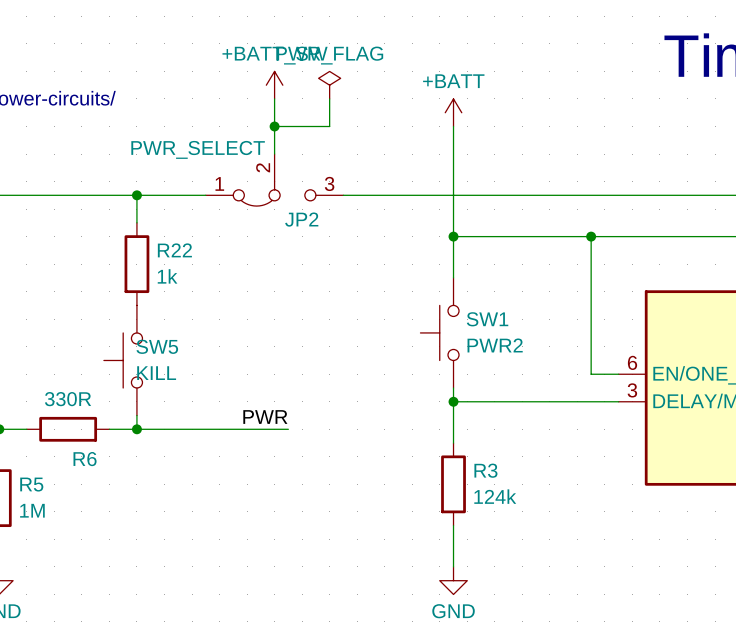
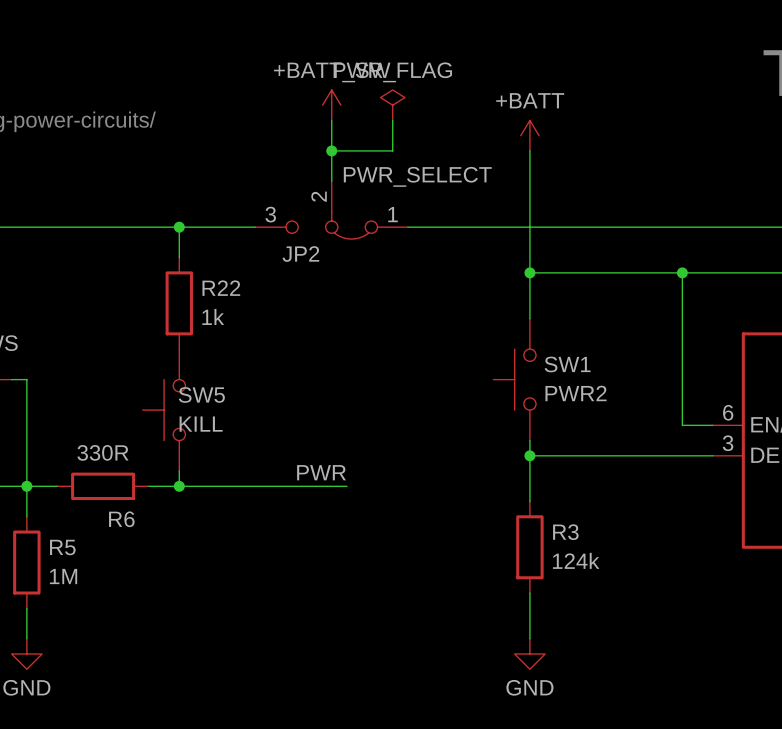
JP2 flip: as is (274, 193) -> left-right (331, 225)

